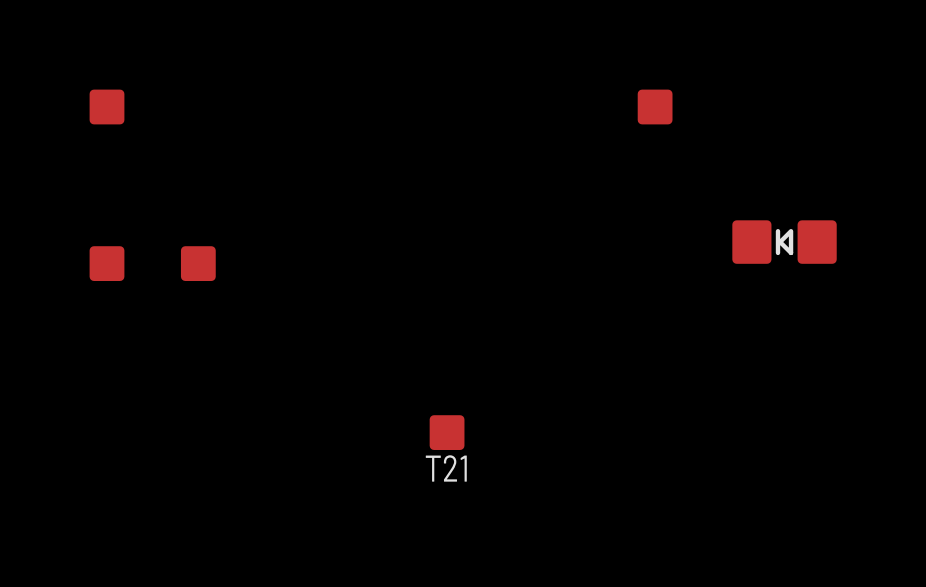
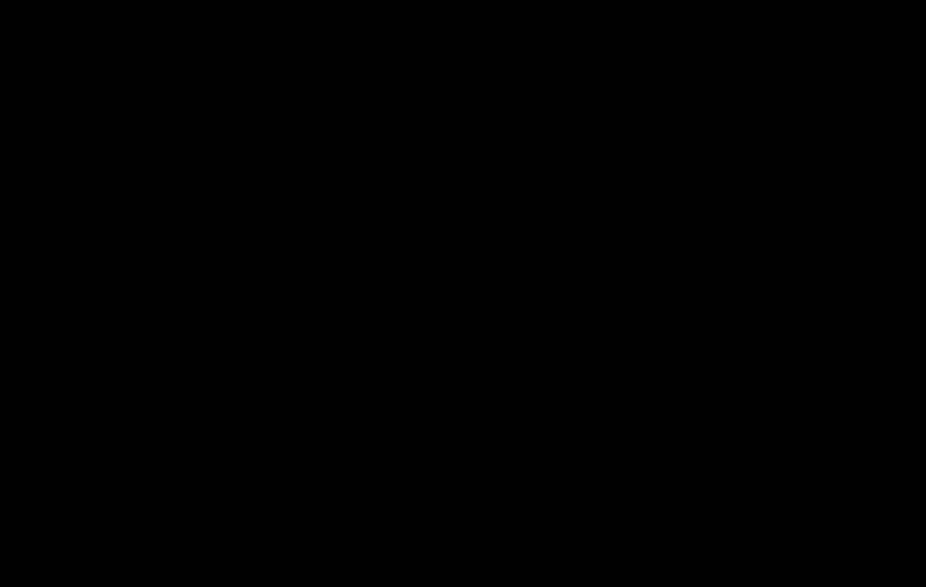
part: (107, 107) -> none
part: (655, 107) -> none
part: (784, 242) -> none
part: (107, 263) -> none
part: (198, 263) -> none
T21: (447, 432) -> none

